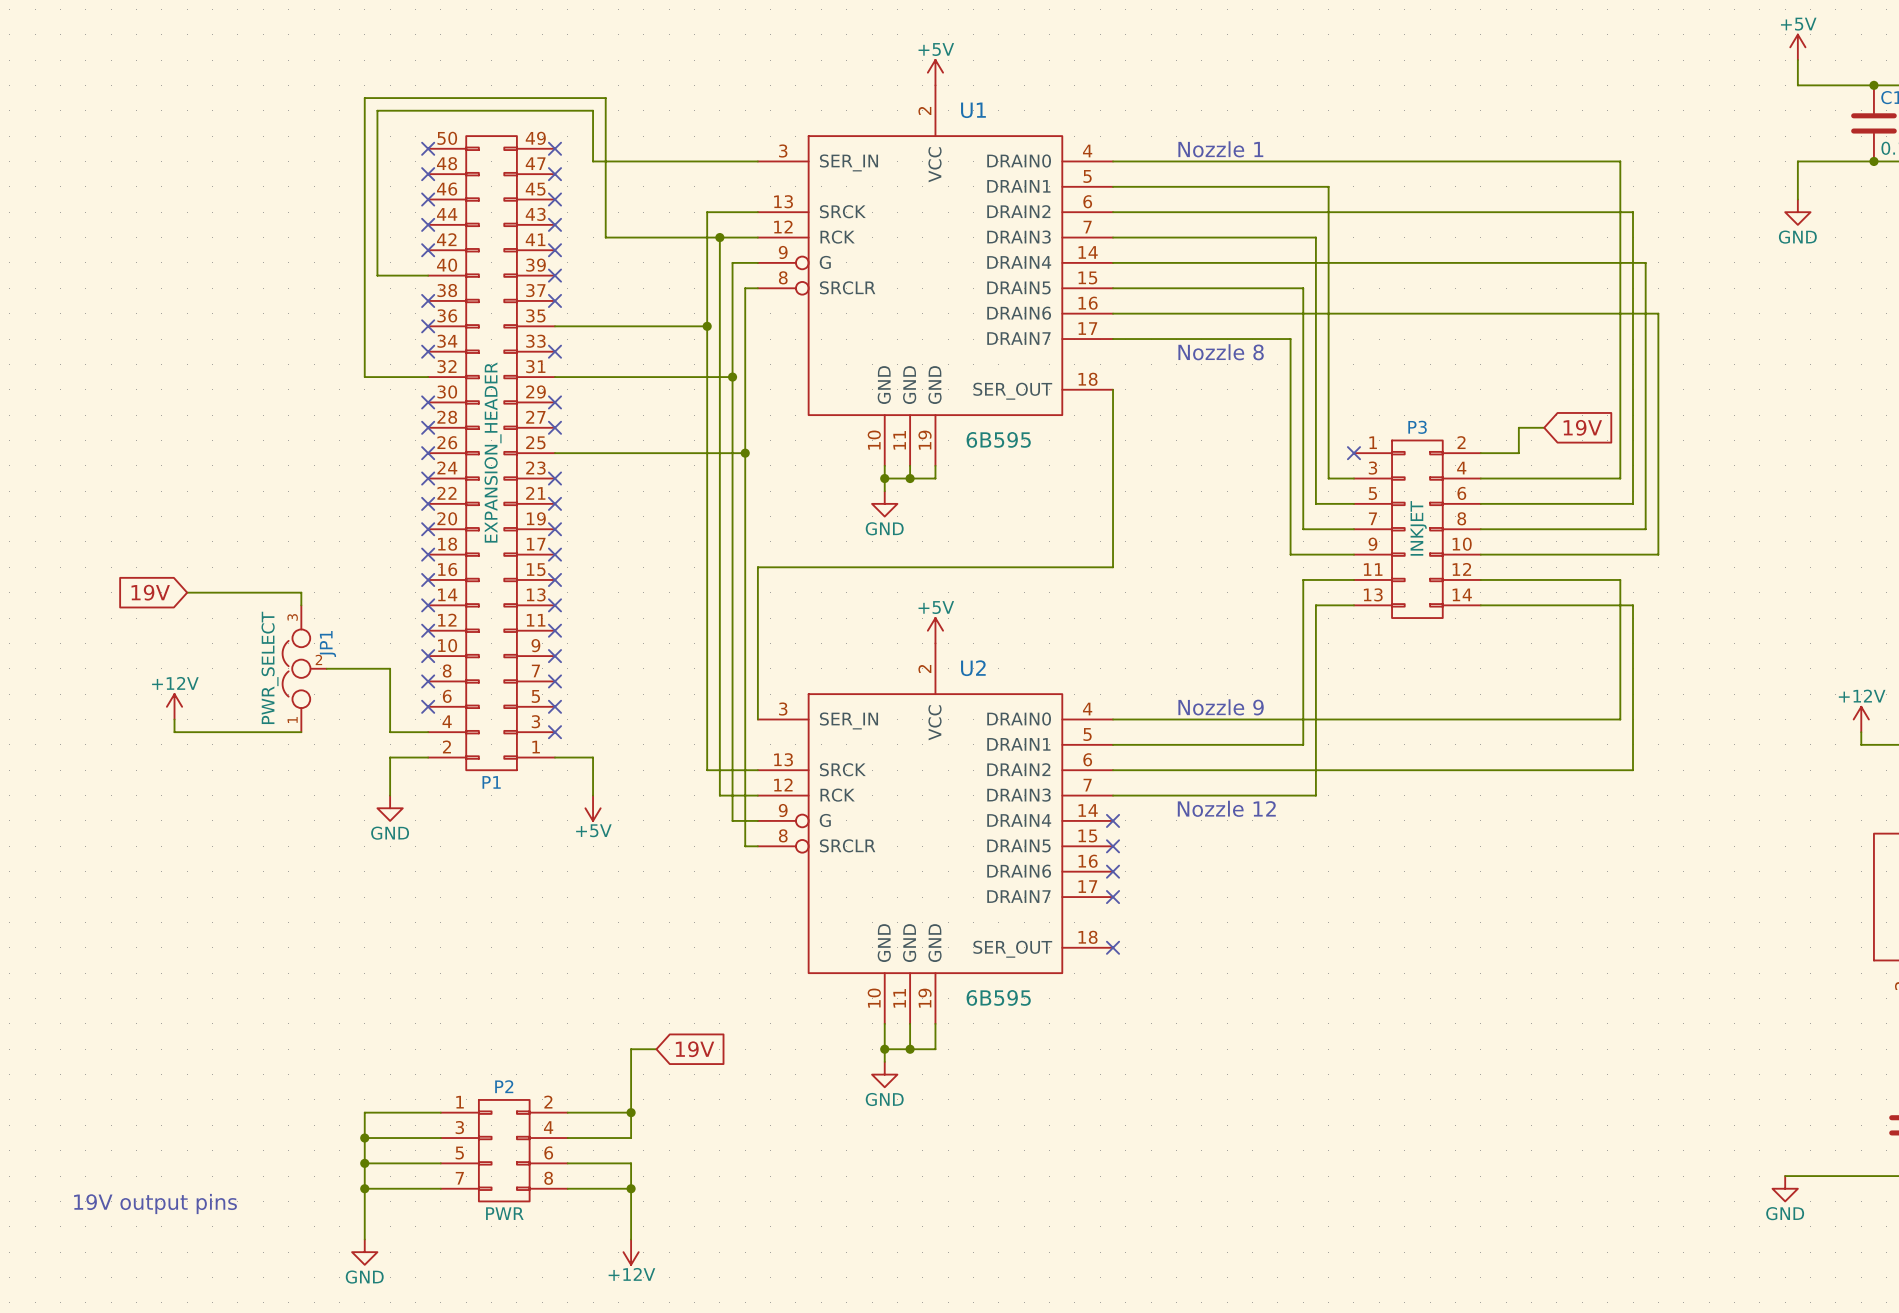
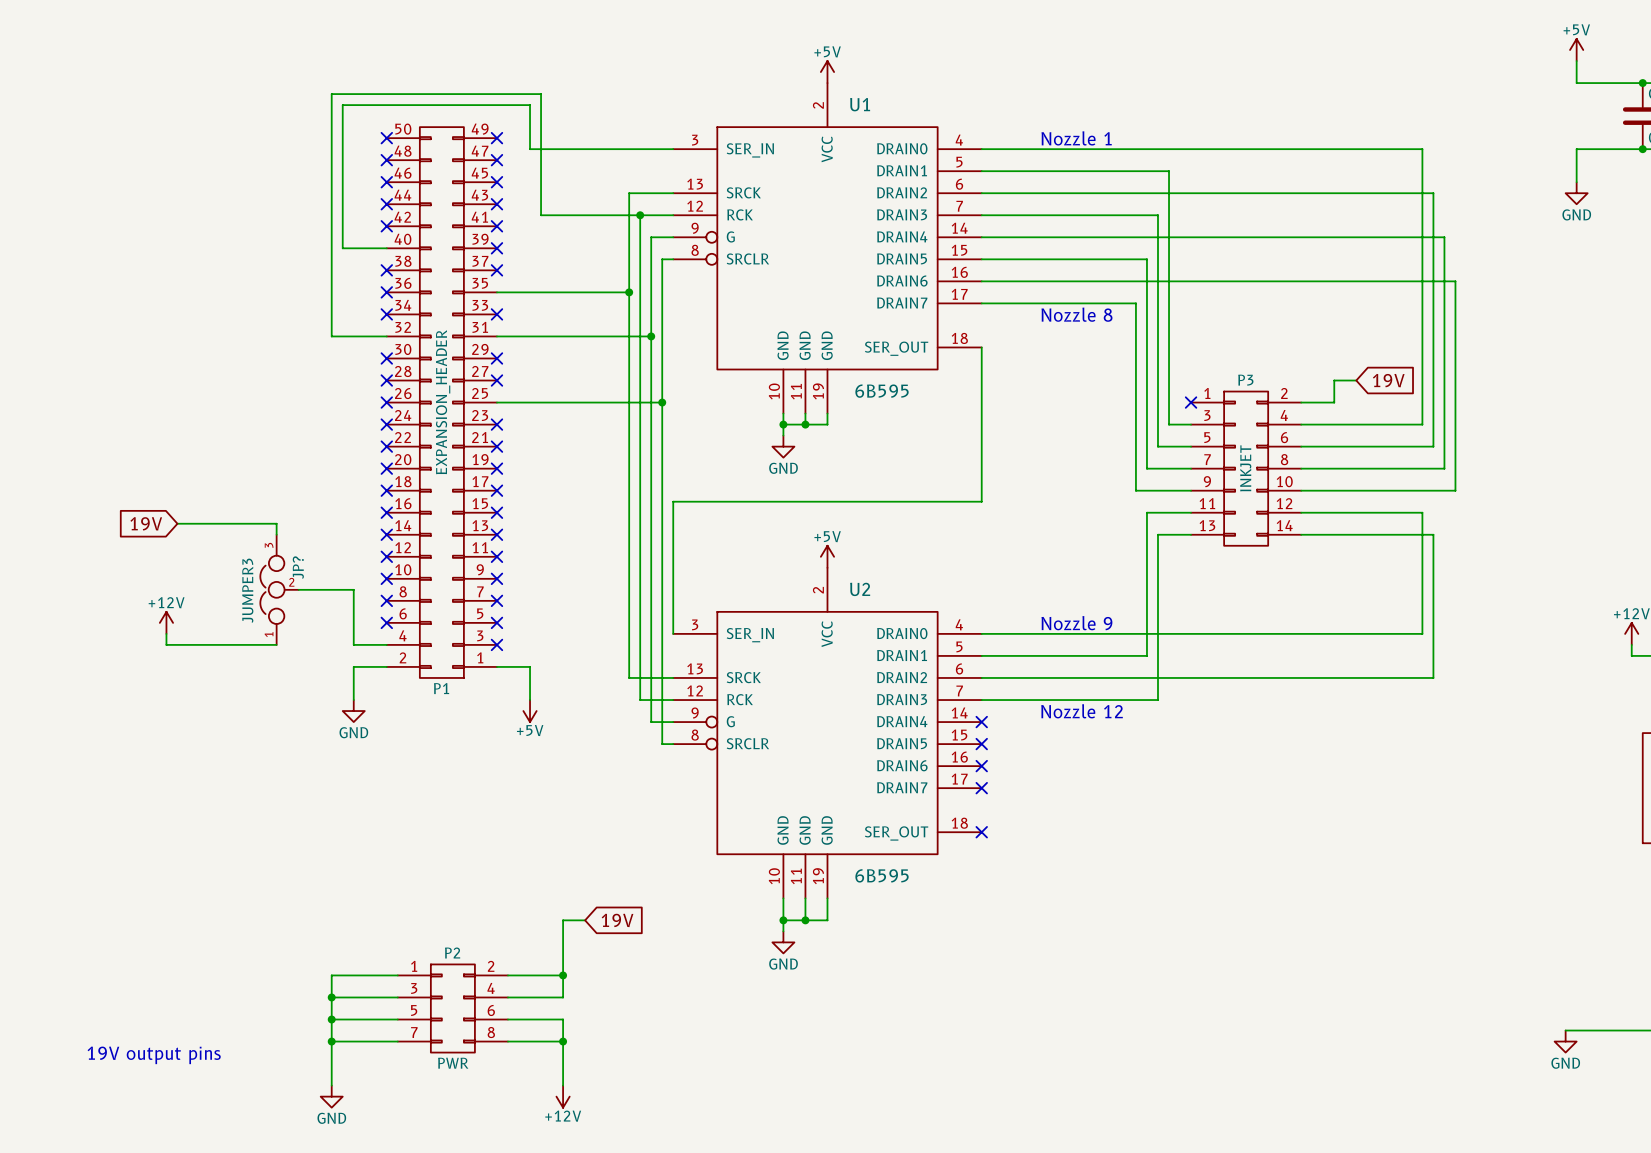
JP1 name: JP1 (327, 643) -> JP? (298, 567)
JP1 value: PWR_SELECT (270, 667) -> JUMPER3 (247, 590)

